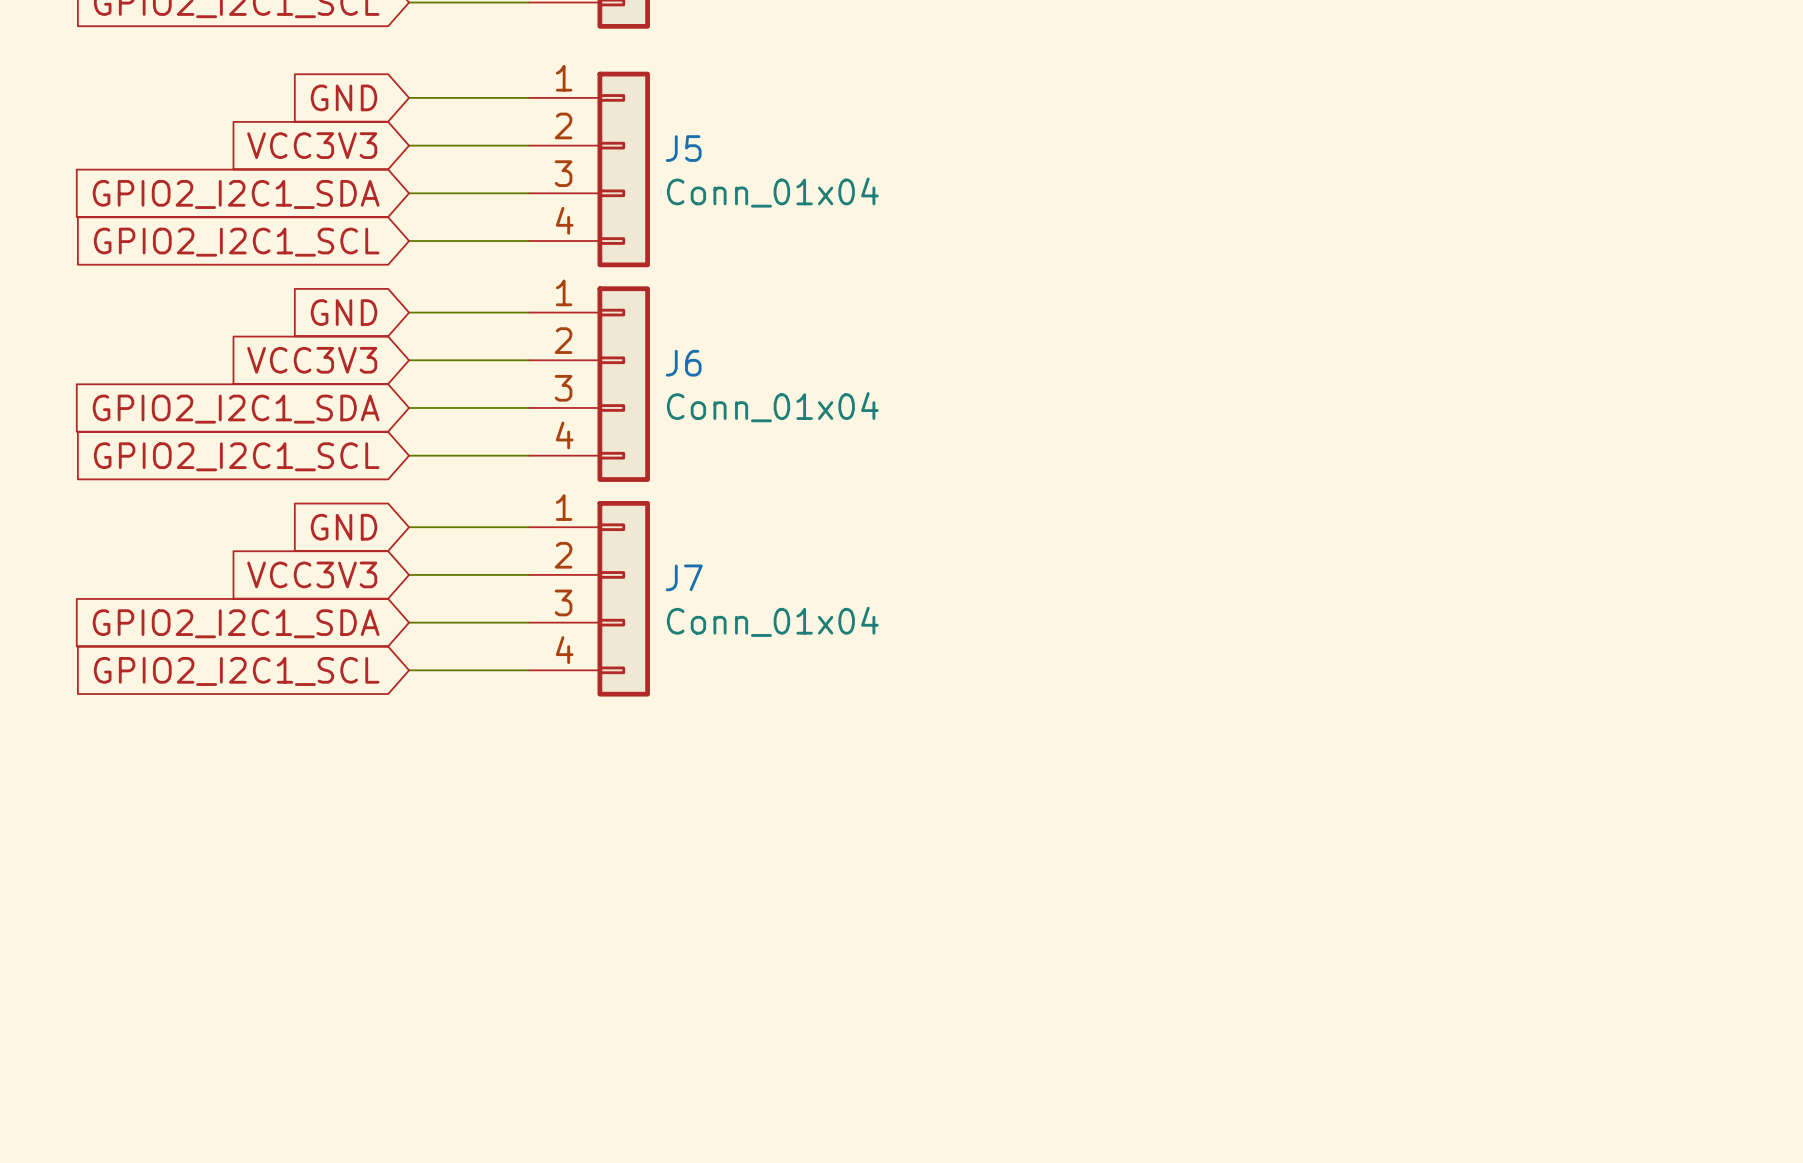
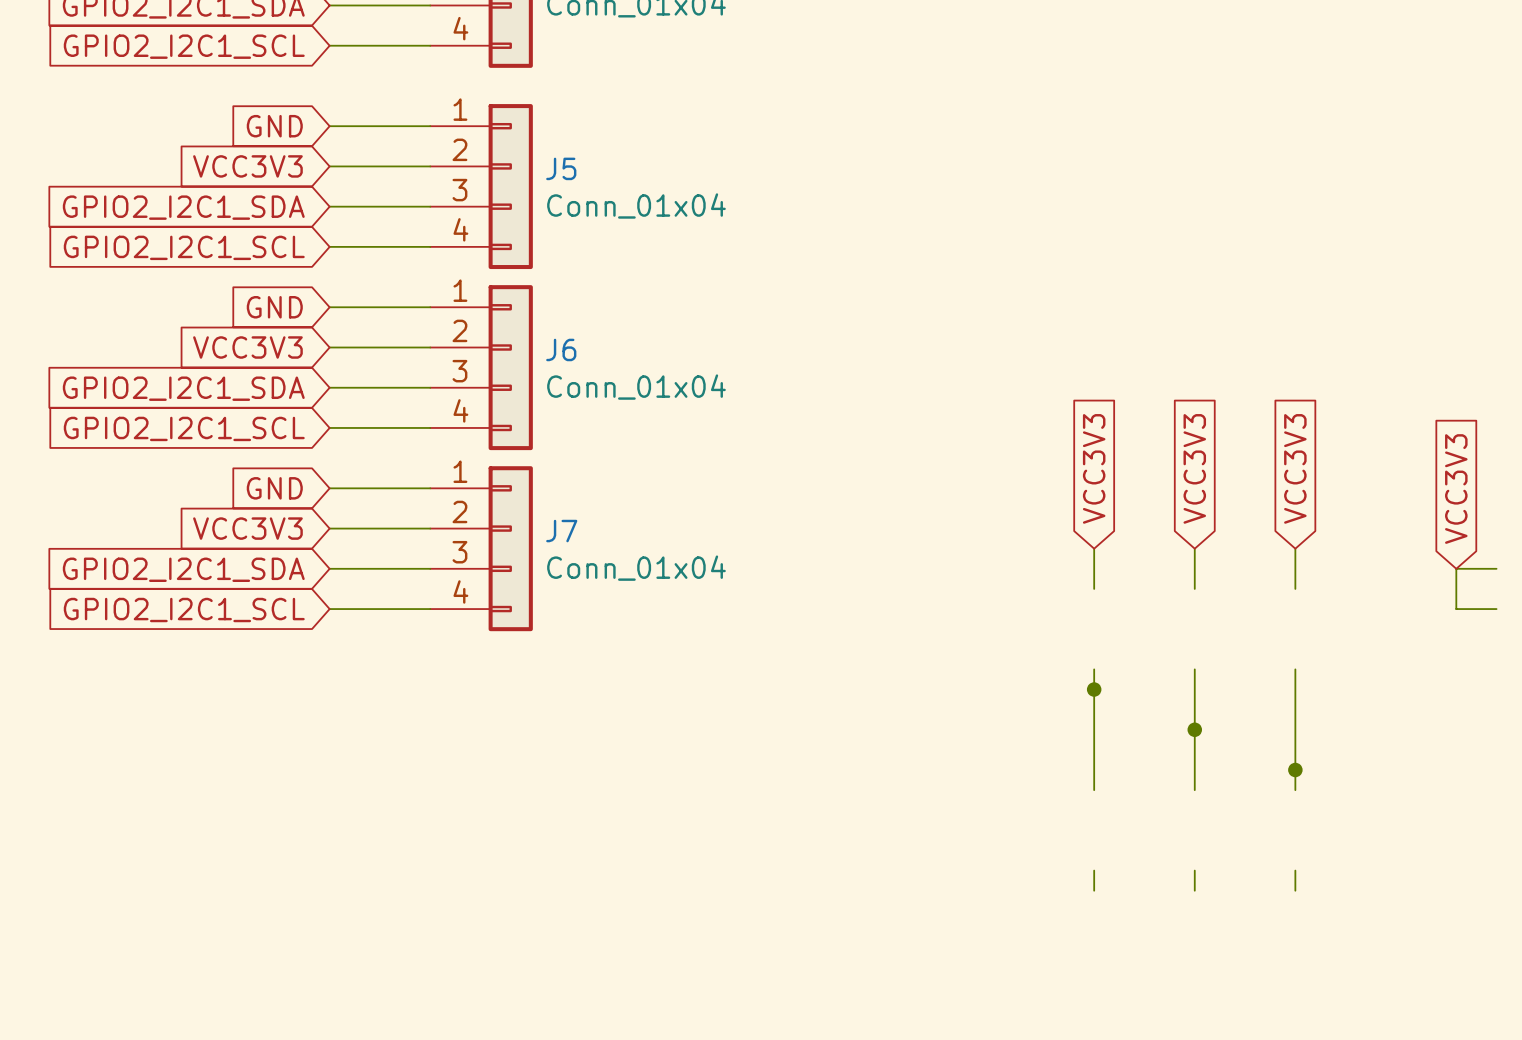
global label: none -> VCC3V3 (1094, 468)
global label: none -> VCC3V3 (1194, 468)
global label: none -> VCC3V3 (1295, 468)
global label: none -> VCC3V3 (1456, 489)
wire: none -> (1094, 548) (1094, 588)
wire: none -> (1194, 548) (1194, 588)
wire: none -> (1295, 548) (1295, 588)
wire: none -> (1496, 568) (1456, 568) (1456, 609) (1496, 609)
wire: none -> (1094, 669) (1094, 790)
wire: none -> (1194, 669) (1194, 790)
wire: none -> (1295, 669) (1295, 790)
junction: none -> (1094, 689)
junction: none -> (1194, 729)
junction: none -> (1295, 770)
wire: none -> (1094, 870) (1094, 890)
wire: none -> (1194, 870) (1194, 890)
wire: none -> (1295, 870) (1295, 890)

